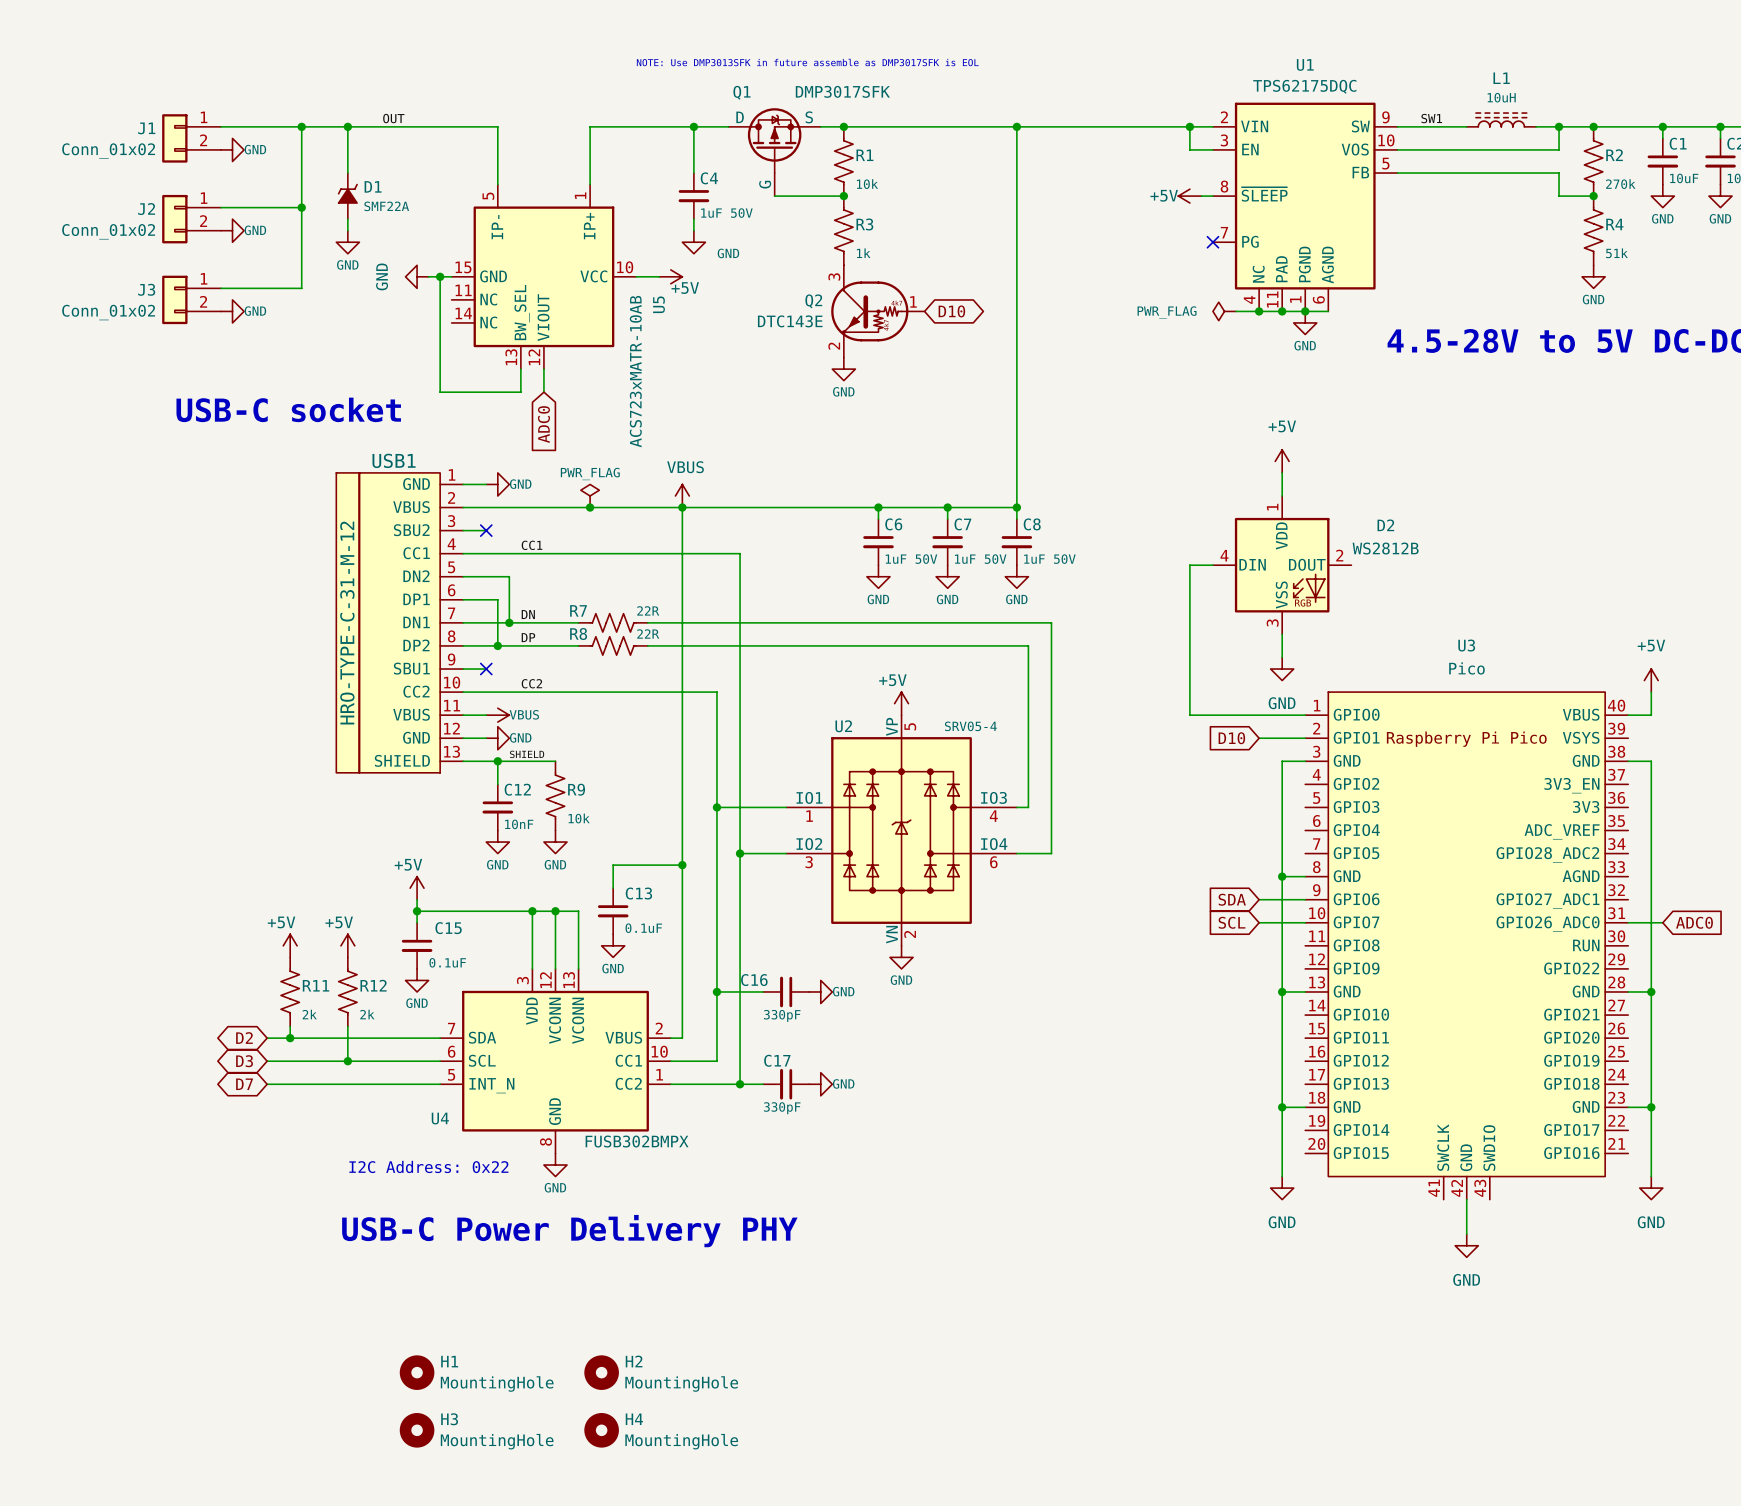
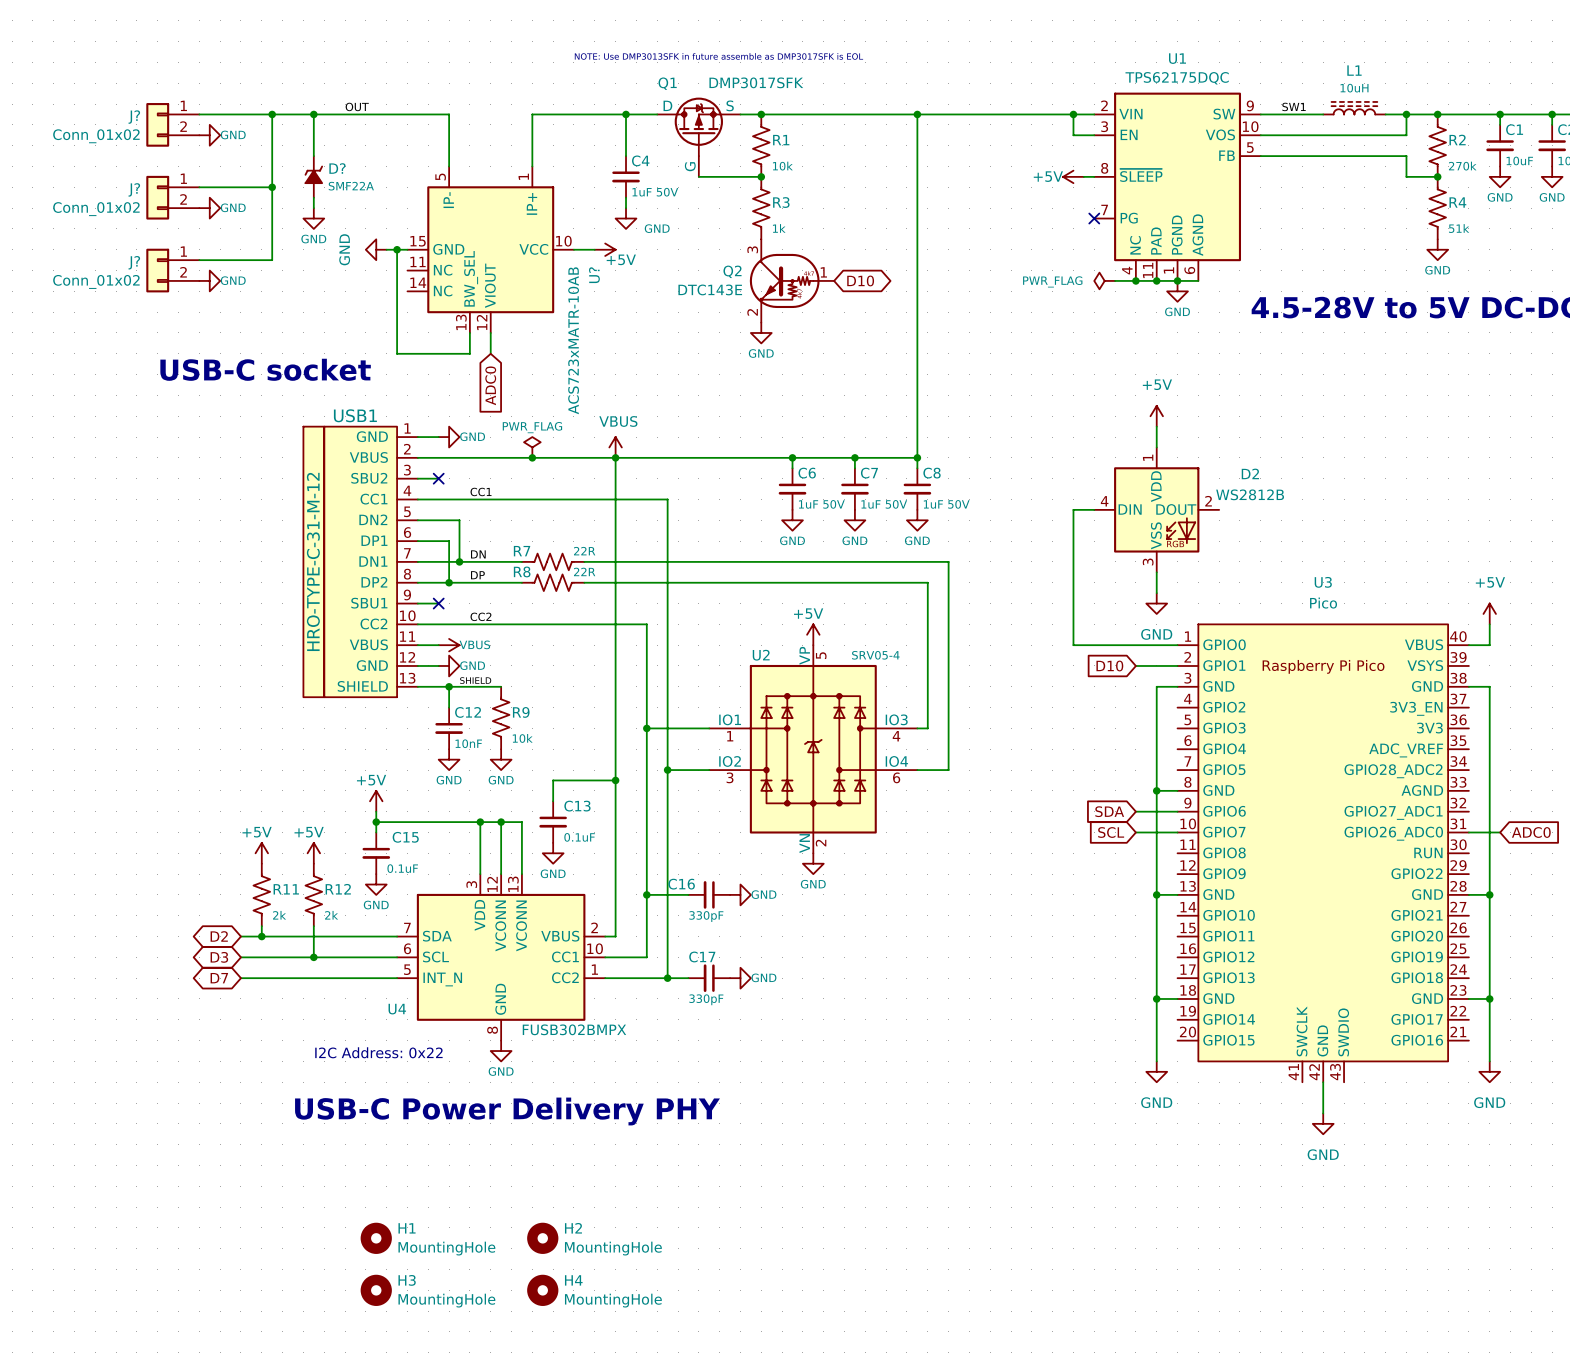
J1 name: J1 (146, 128) -> J? (134, 117)
D1 name: D1 (373, 186) -> D? (337, 168)
J2 name: J2 (146, 209) -> J? (134, 189)
J3 name: J3 (146, 289) -> J? (134, 262)
U5 name: U5 (658, 304) -> U? (594, 275)

